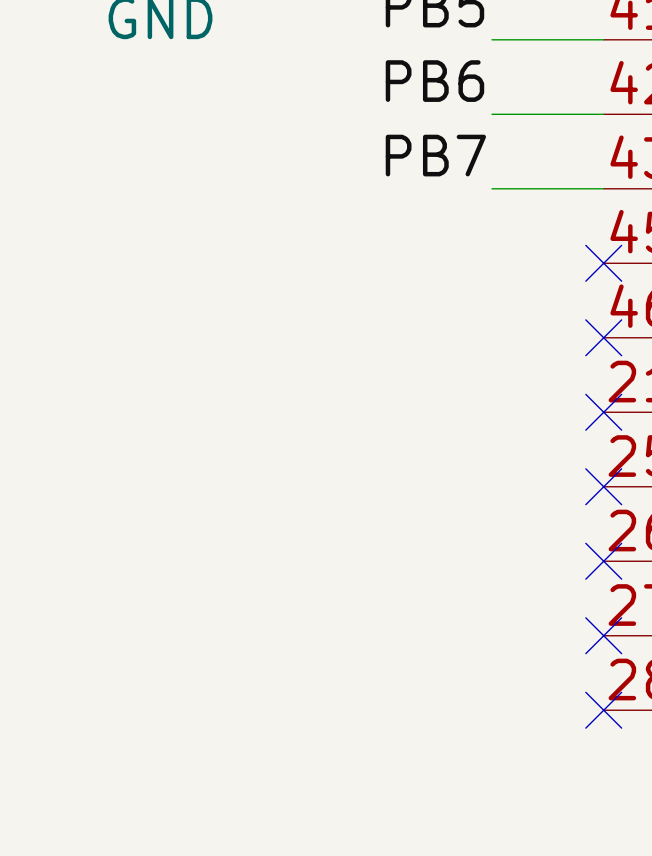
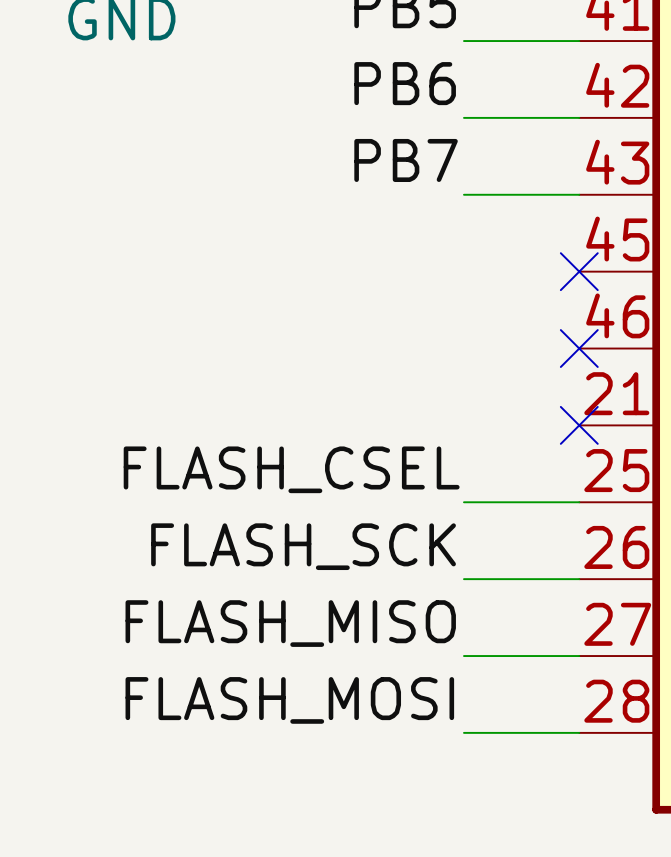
label: none -> FLASH_CSEL (291, 469)
wire: none -> (463, 502) (579, 502)
no-connect mark: (603, 486) -> none
label: none -> FLASH_SCK (303, 546)
wire: none -> (463, 579) (579, 579)
no-connect mark: (603, 561) -> none
label: none -> FLASH_MISO (290, 623)
wire: none -> (463, 656) (579, 656)
no-connect mark: (603, 635) -> none
label: none -> FLASH_MOSI (289, 700)
wire: none -> (463, 732) (579, 732)
no-connect mark: (603, 710) -> none

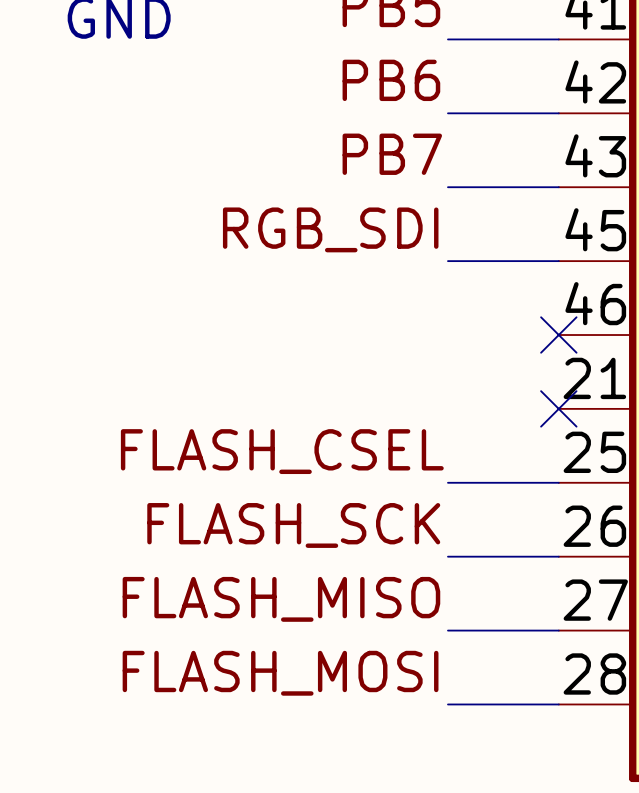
label: none -> RGB_SDI (330, 229)
wire: none -> (447, 261) (558, 261)
no-connect mark: (579, 271) -> none

